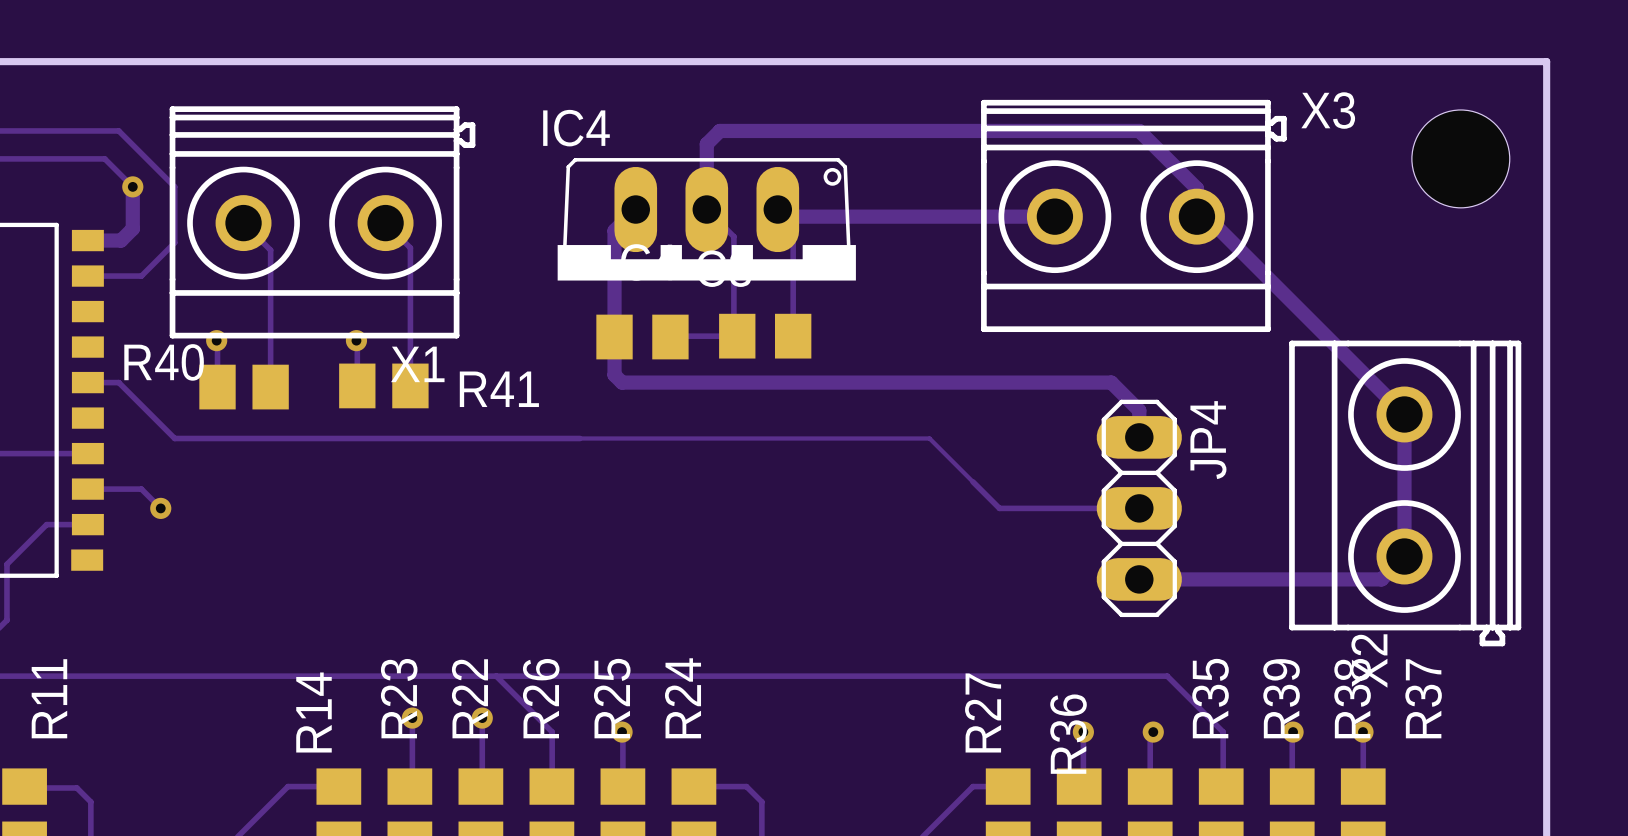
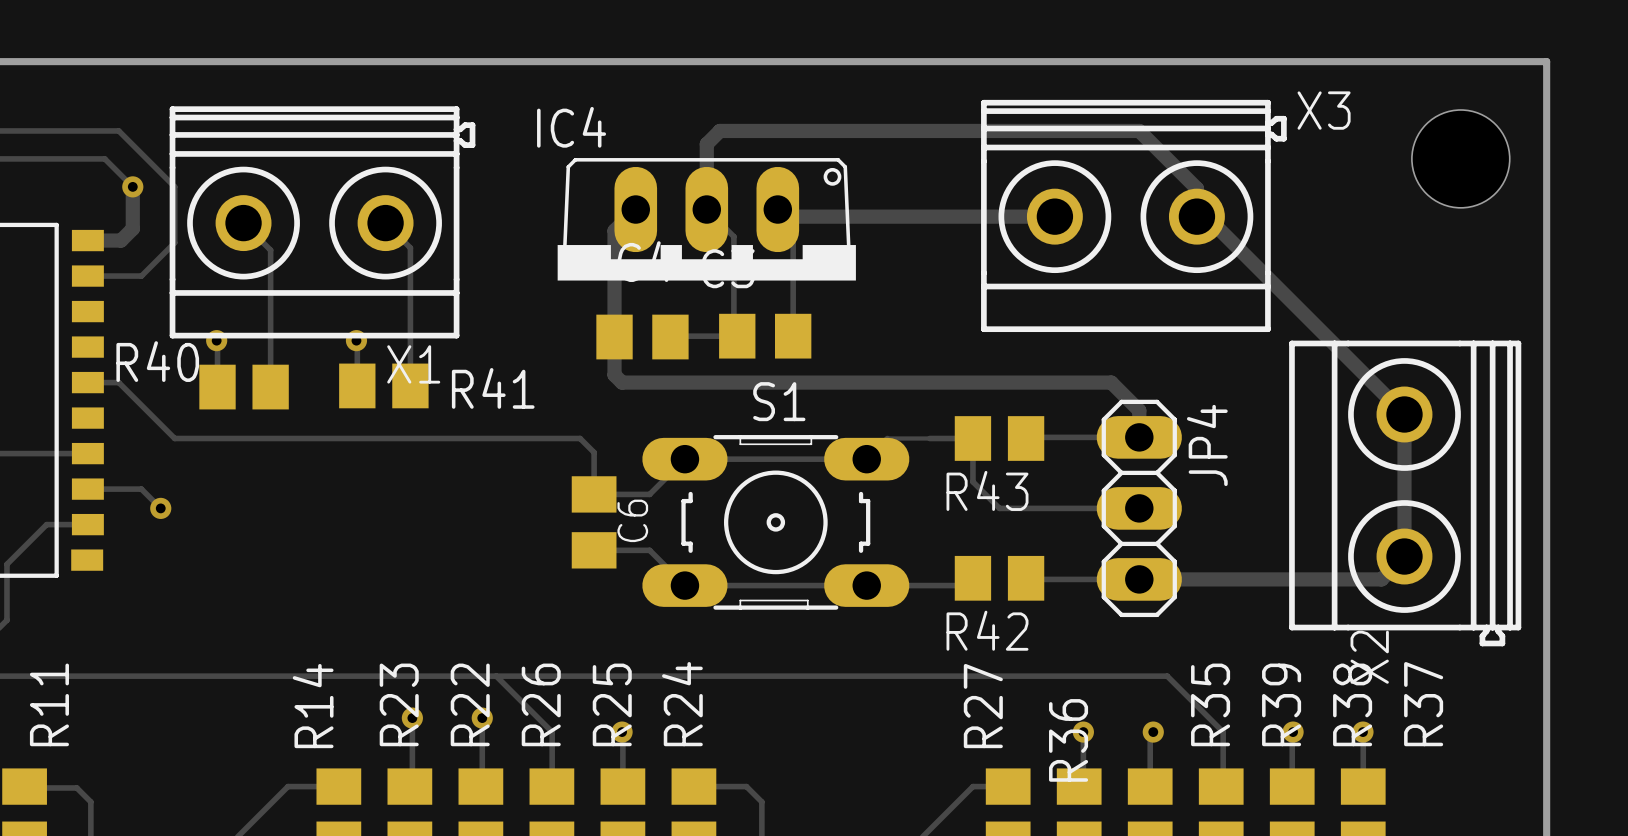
track: none -> (1139, 437) (1026, 438)
track: (580, 438) (887, 438) -> (580, 438) (594, 452) (594, 494) (649, 494) (684, 459) (866, 459) (887, 438)
track: (929, 438) (972, 481) -> (929, 438) (972, 438) (972, 481)
R43: none -> (999, 438)
C6: none -> (594, 522)
S1: none -> (775, 522)
track: none -> (594, 550) (649, 550) (684, 585) (965, 585) (972, 578)
R42: none -> (999, 578)
track: none -> (1026, 578) (1139, 579)

